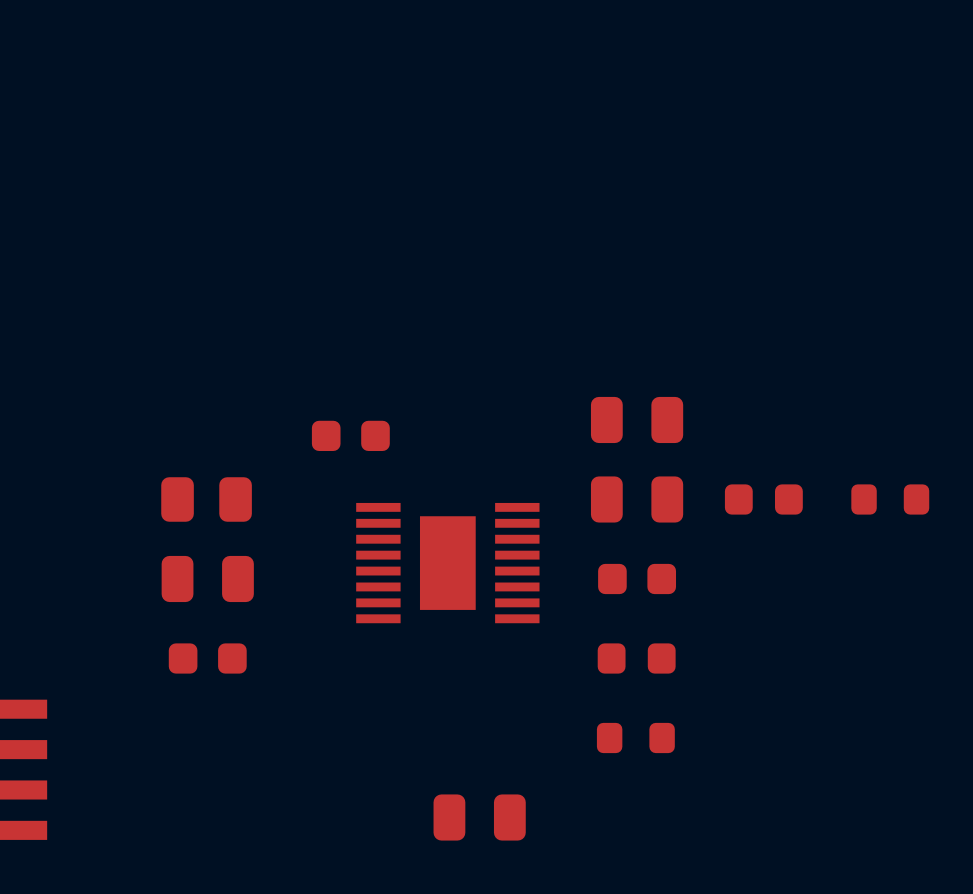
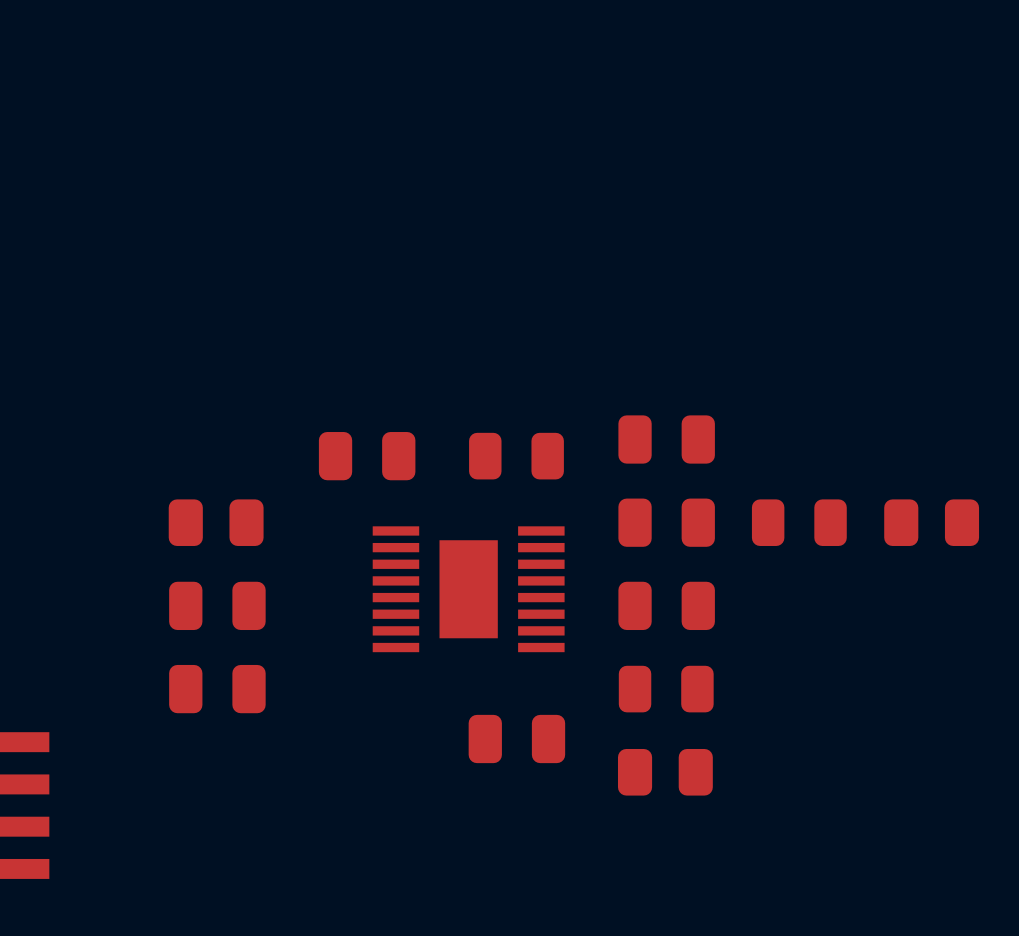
part footprint: [311, 420, 390, 451] -> [318, 432, 416, 481]
part: none -> (516, 456)
part footprint: [724, 484, 803, 515] -> [751, 499, 847, 546]
part footprint: [851, 484, 930, 515] -> [884, 499, 980, 546]
part footprint: [598, 563, 677, 595] -> [618, 581, 715, 631]
part footprint: [168, 643, 247, 674] -> [169, 664, 266, 714]
part footprint: [597, 643, 676, 674] -> [618, 665, 714, 713]
part footprint: [596, 722, 675, 754] -> [617, 748, 713, 796]
part position: (479, 817) -> (516, 739)

